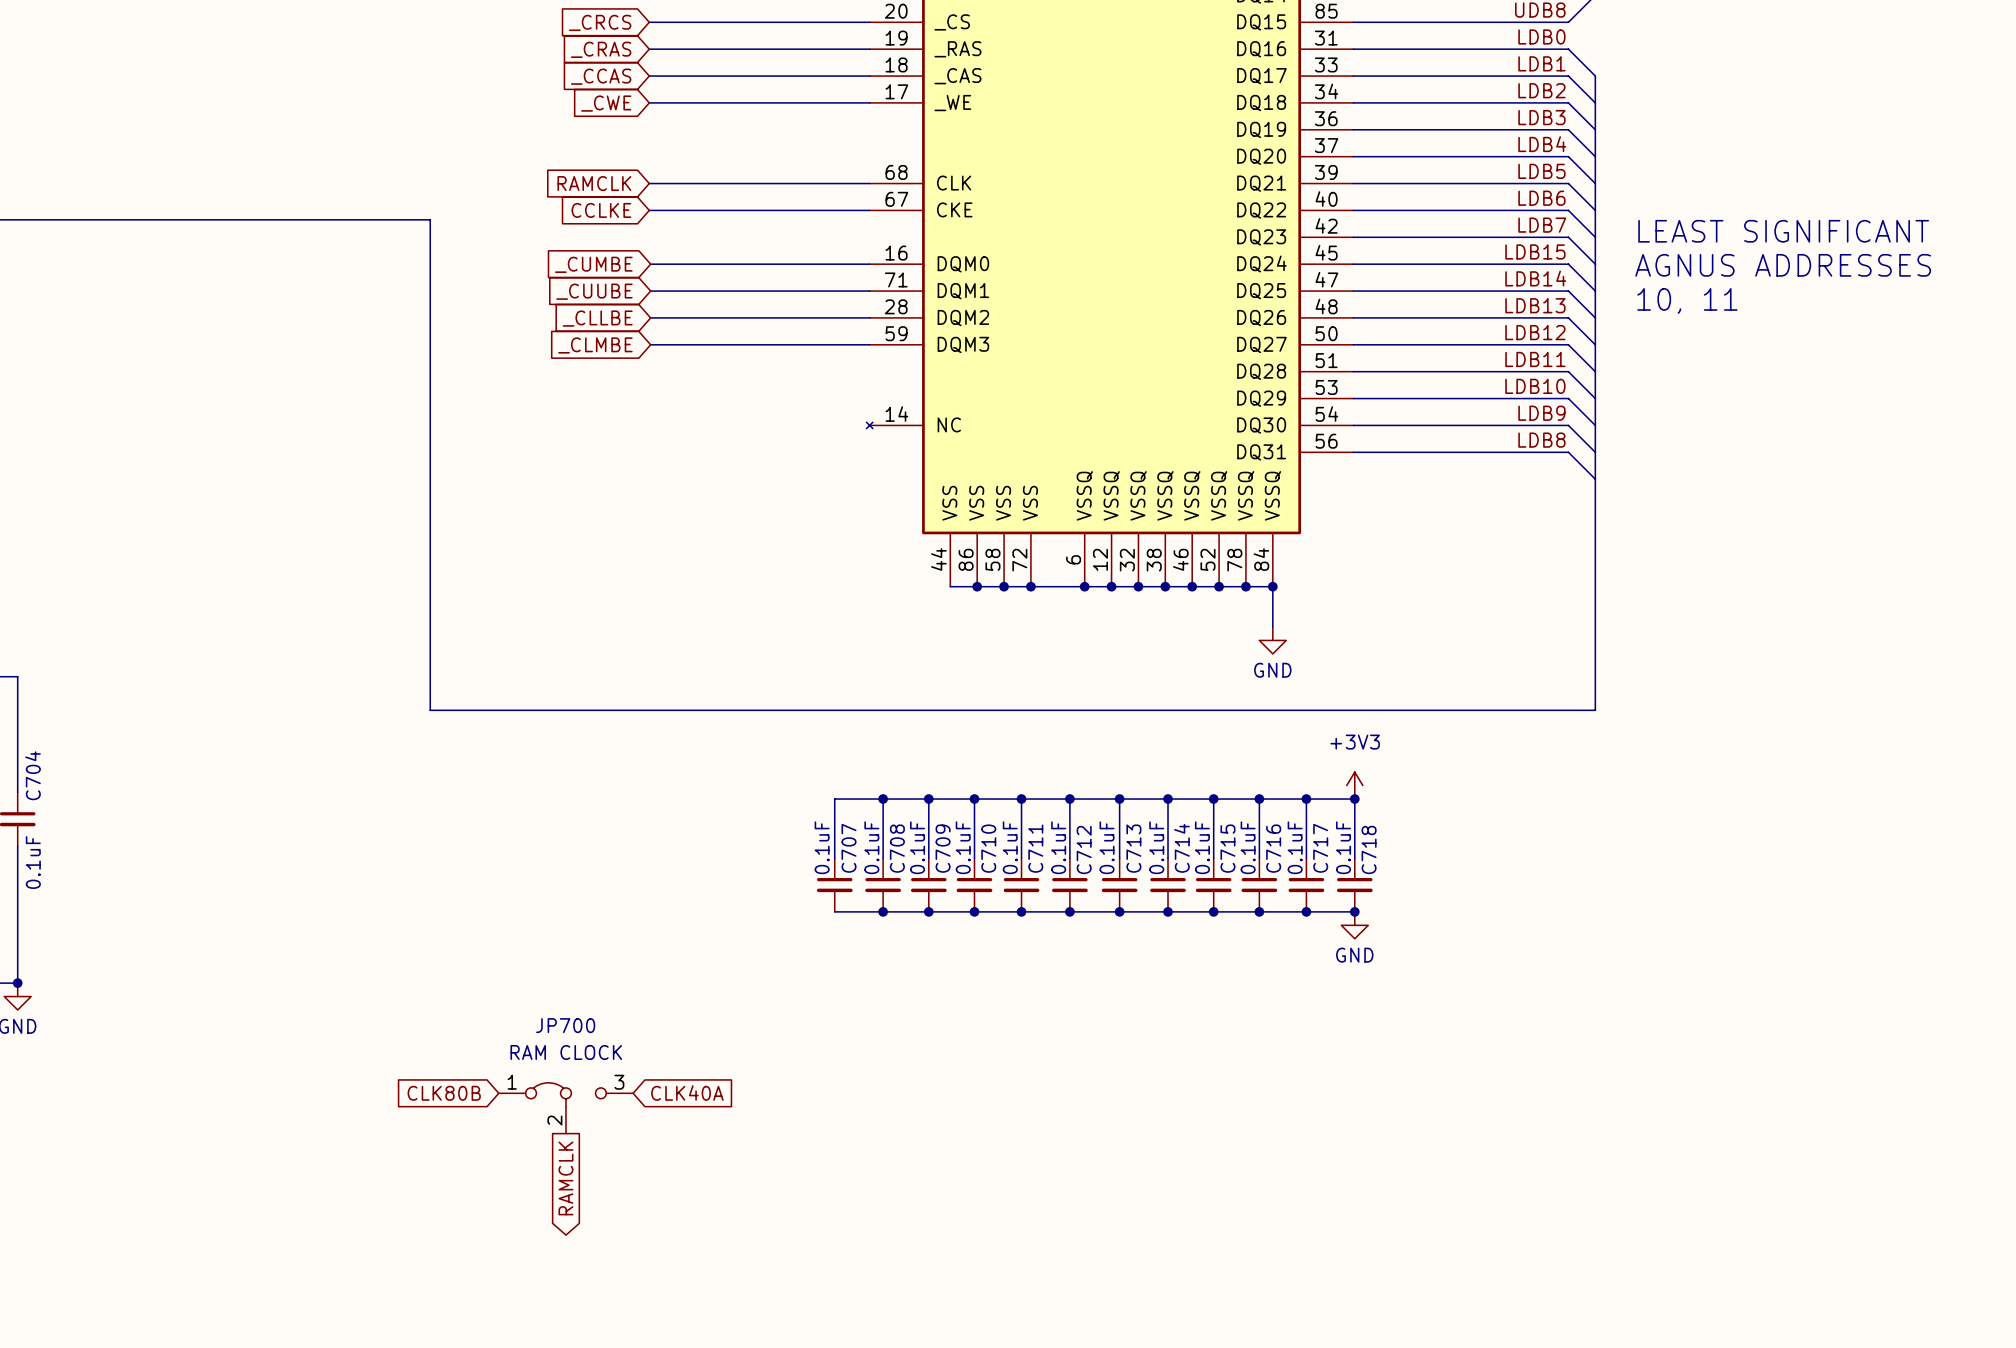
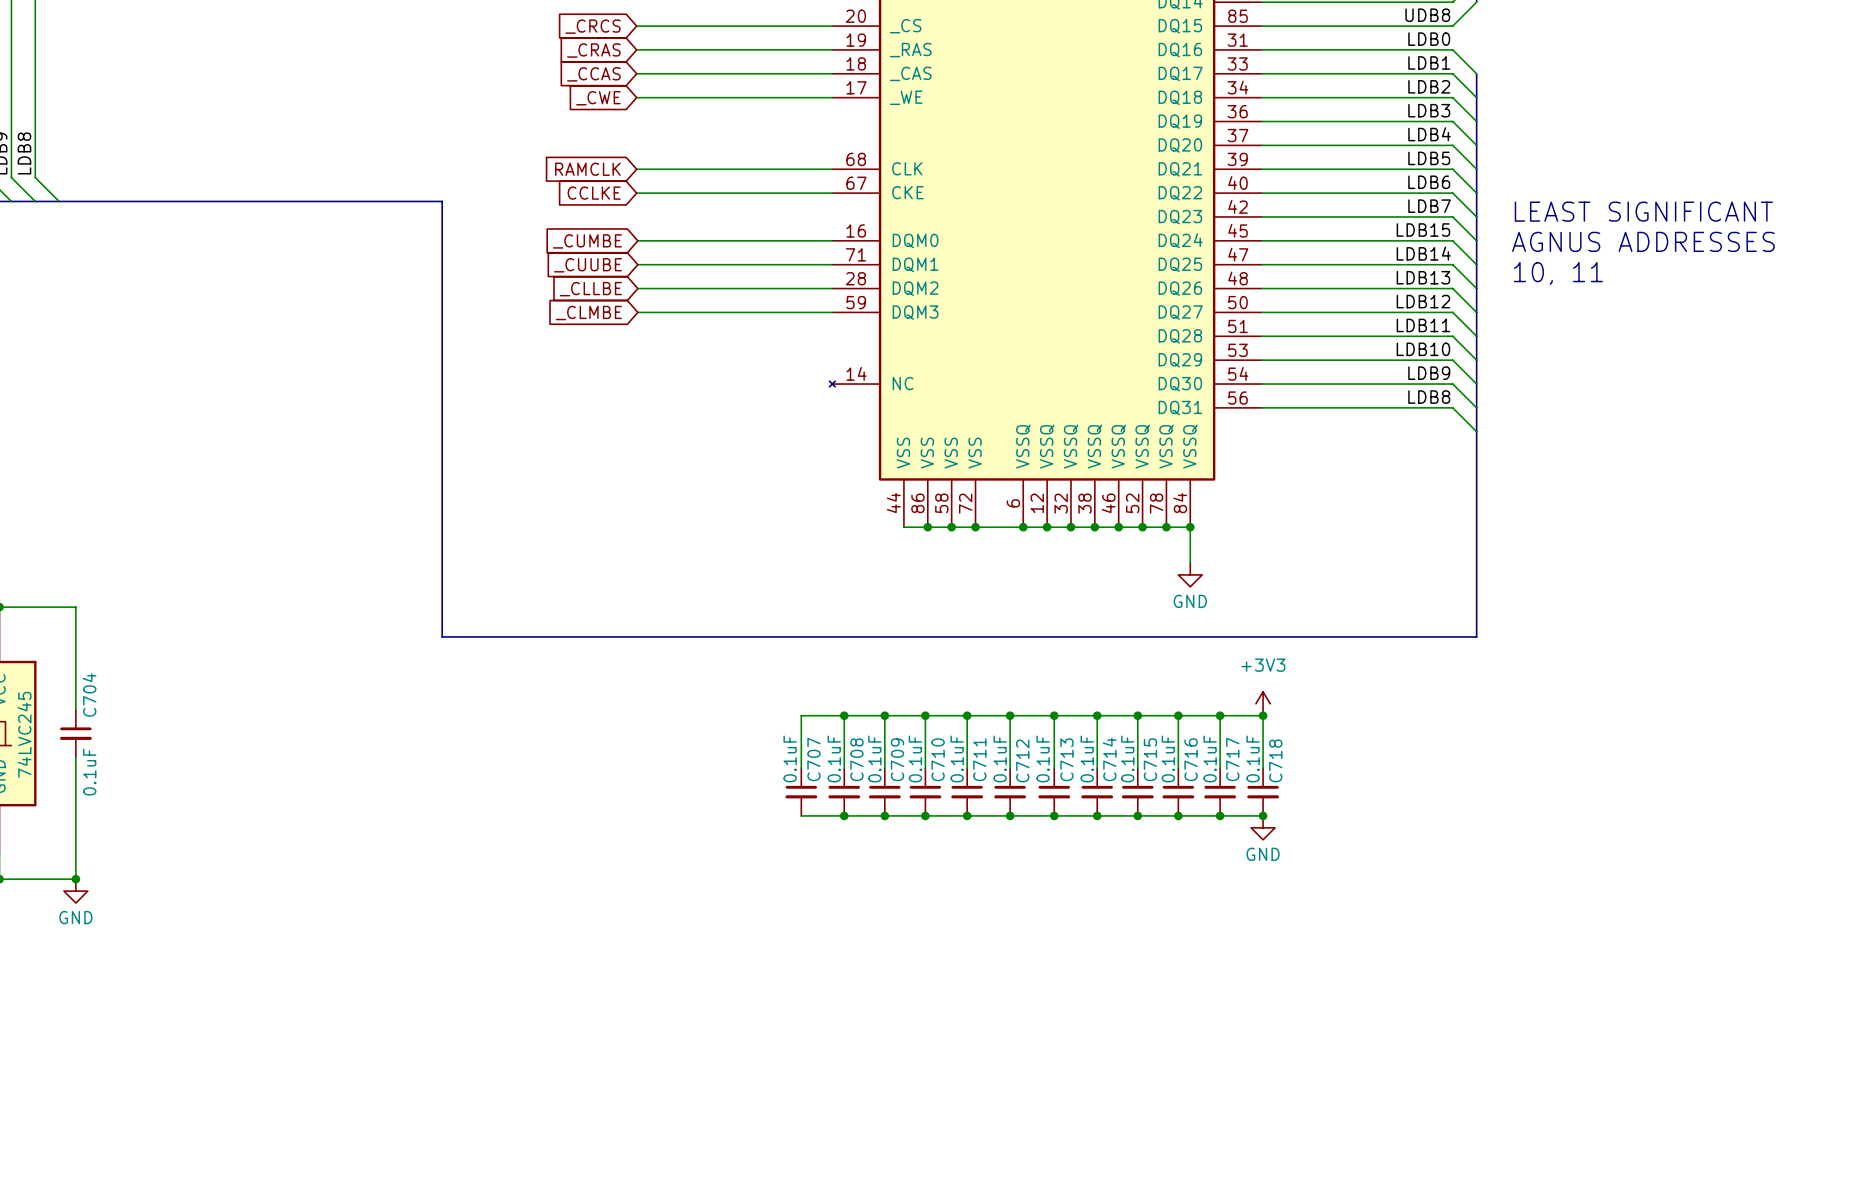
global label: CLK40A (687, 1092) -> none
global label: CLK80B (444, 1093) -> none
JP700: RAM CLOCK (565, 1108) -> none
global label: RAMCLK (565, 1178) -> none

